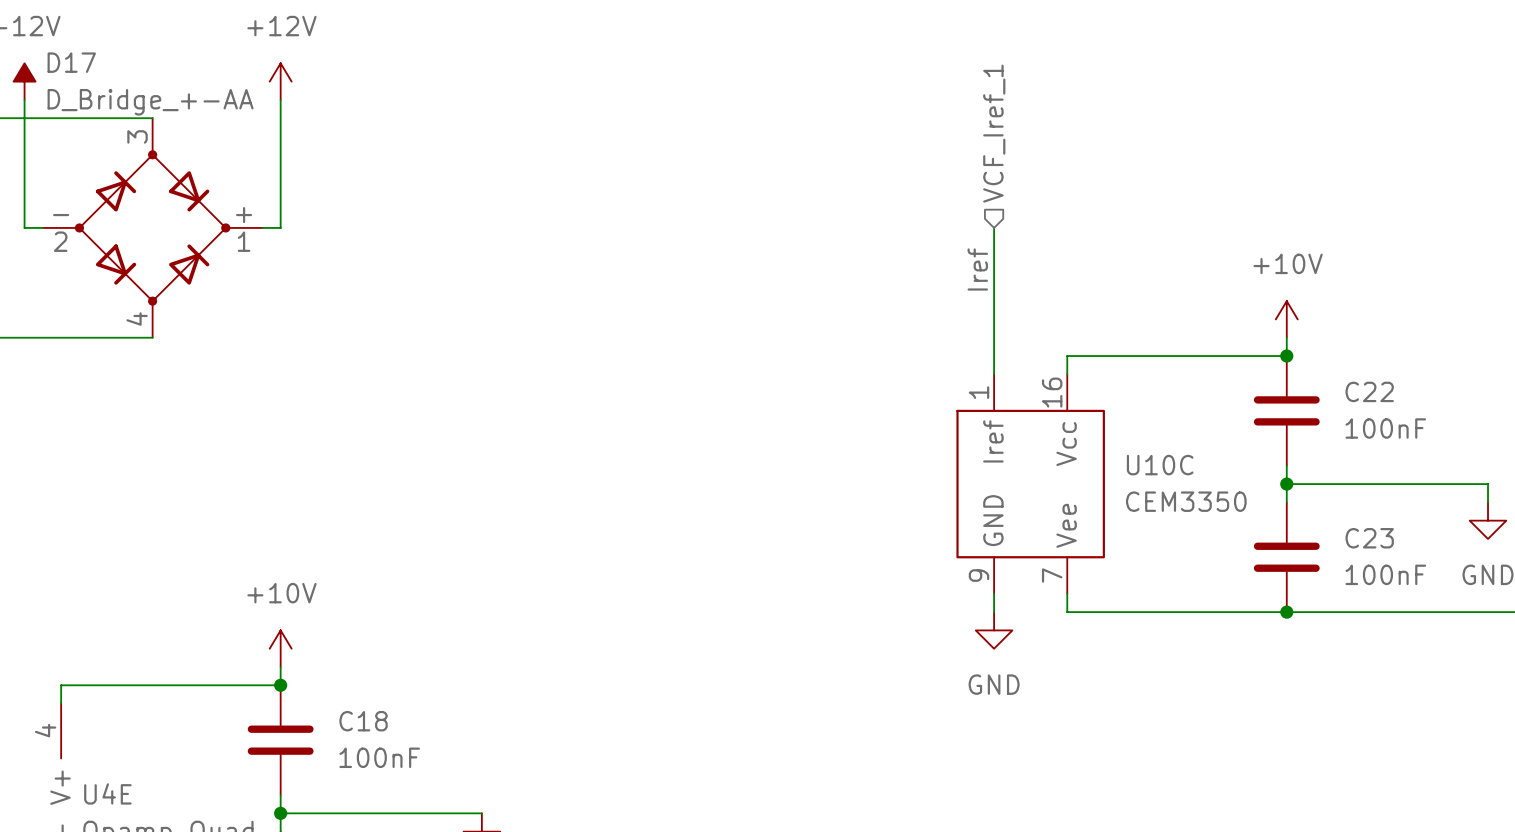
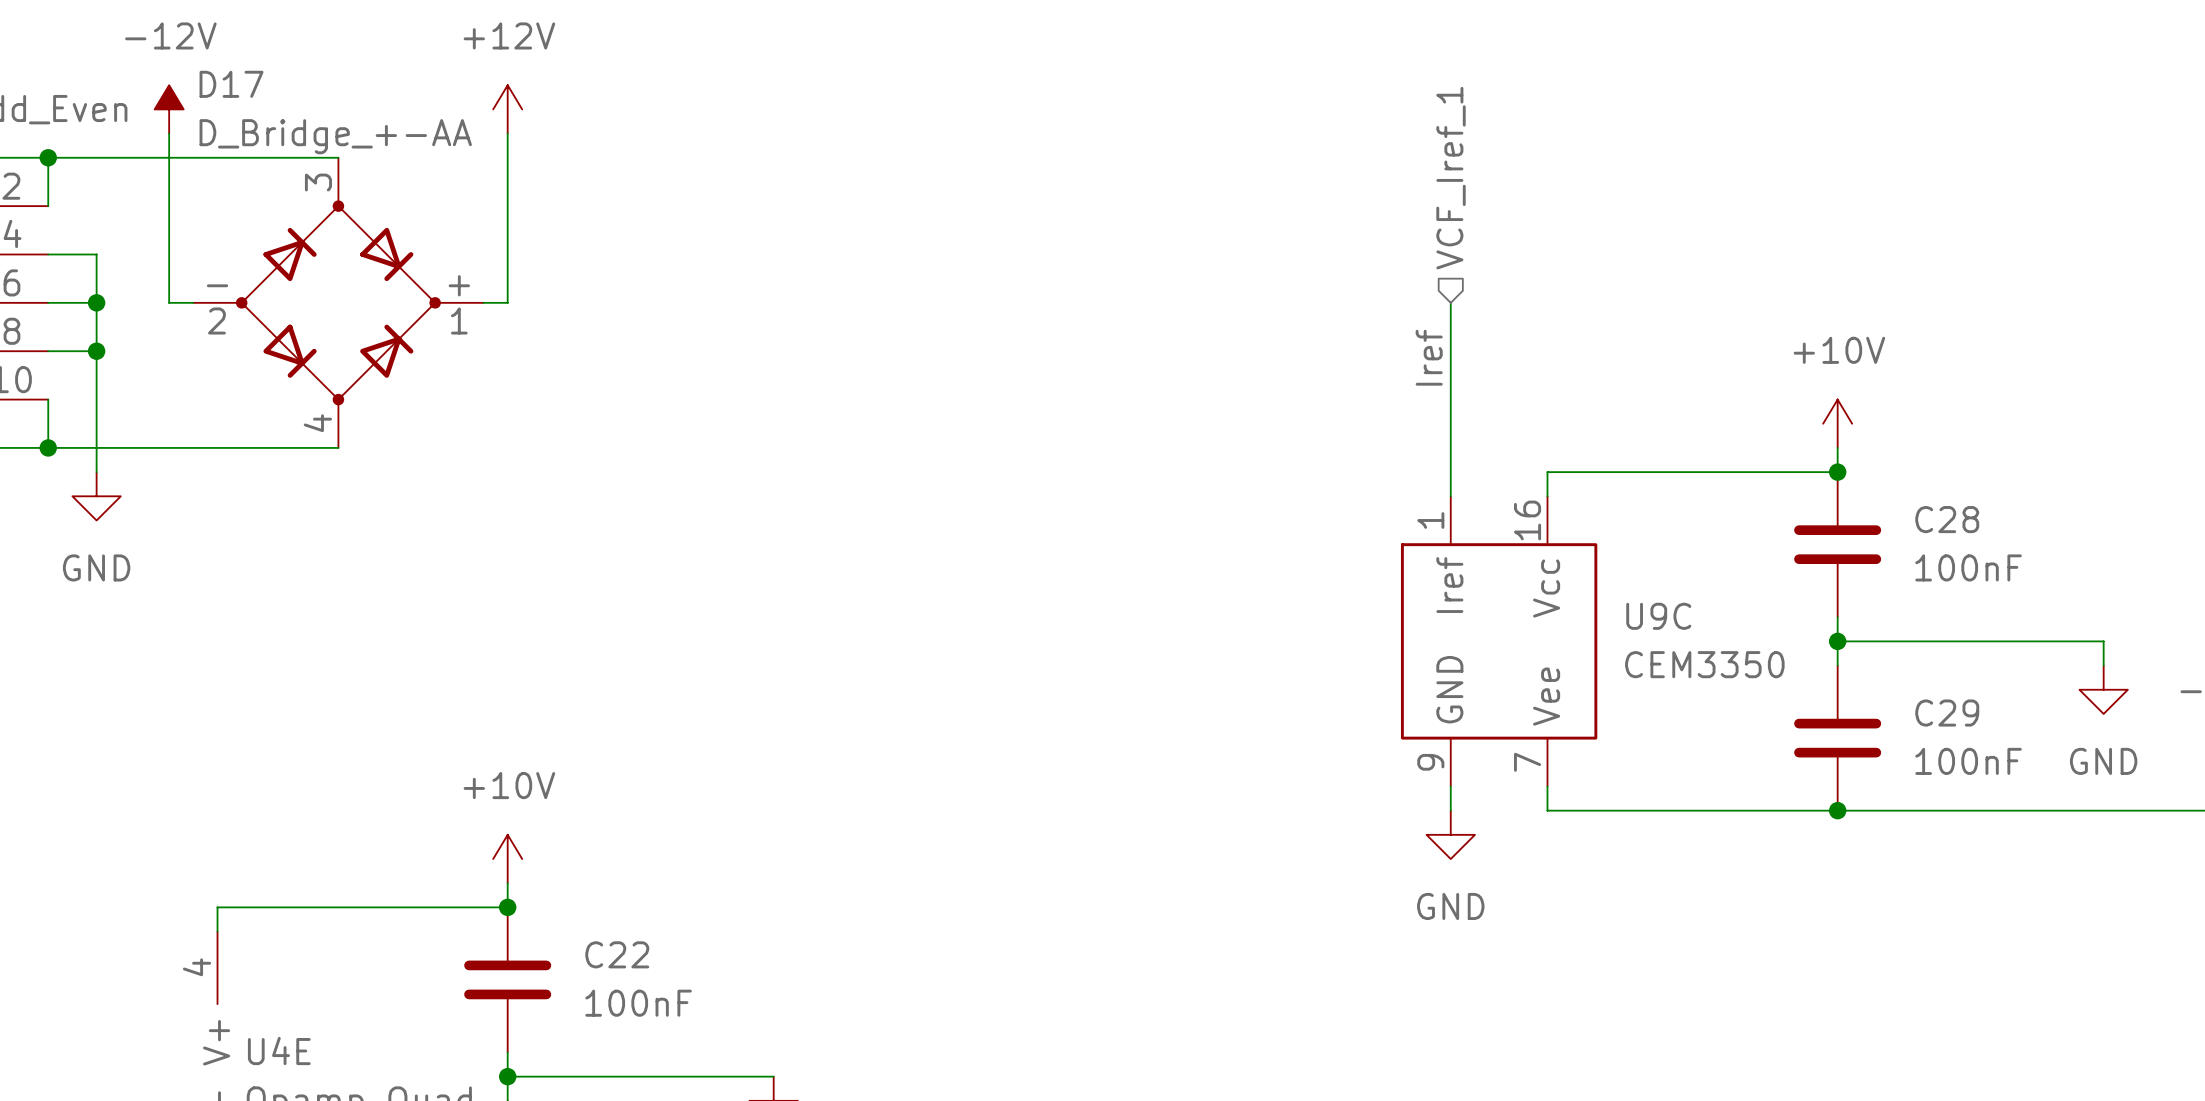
C22 name: C22 (1369, 391) -> C28 (1947, 519)
U10C name: U10C (1160, 465) -> U9C (1658, 616)
C23 name: C23 (1369, 538) -> C29 (1947, 713)
C18 name: C18 (363, 721) -> C22 (617, 954)

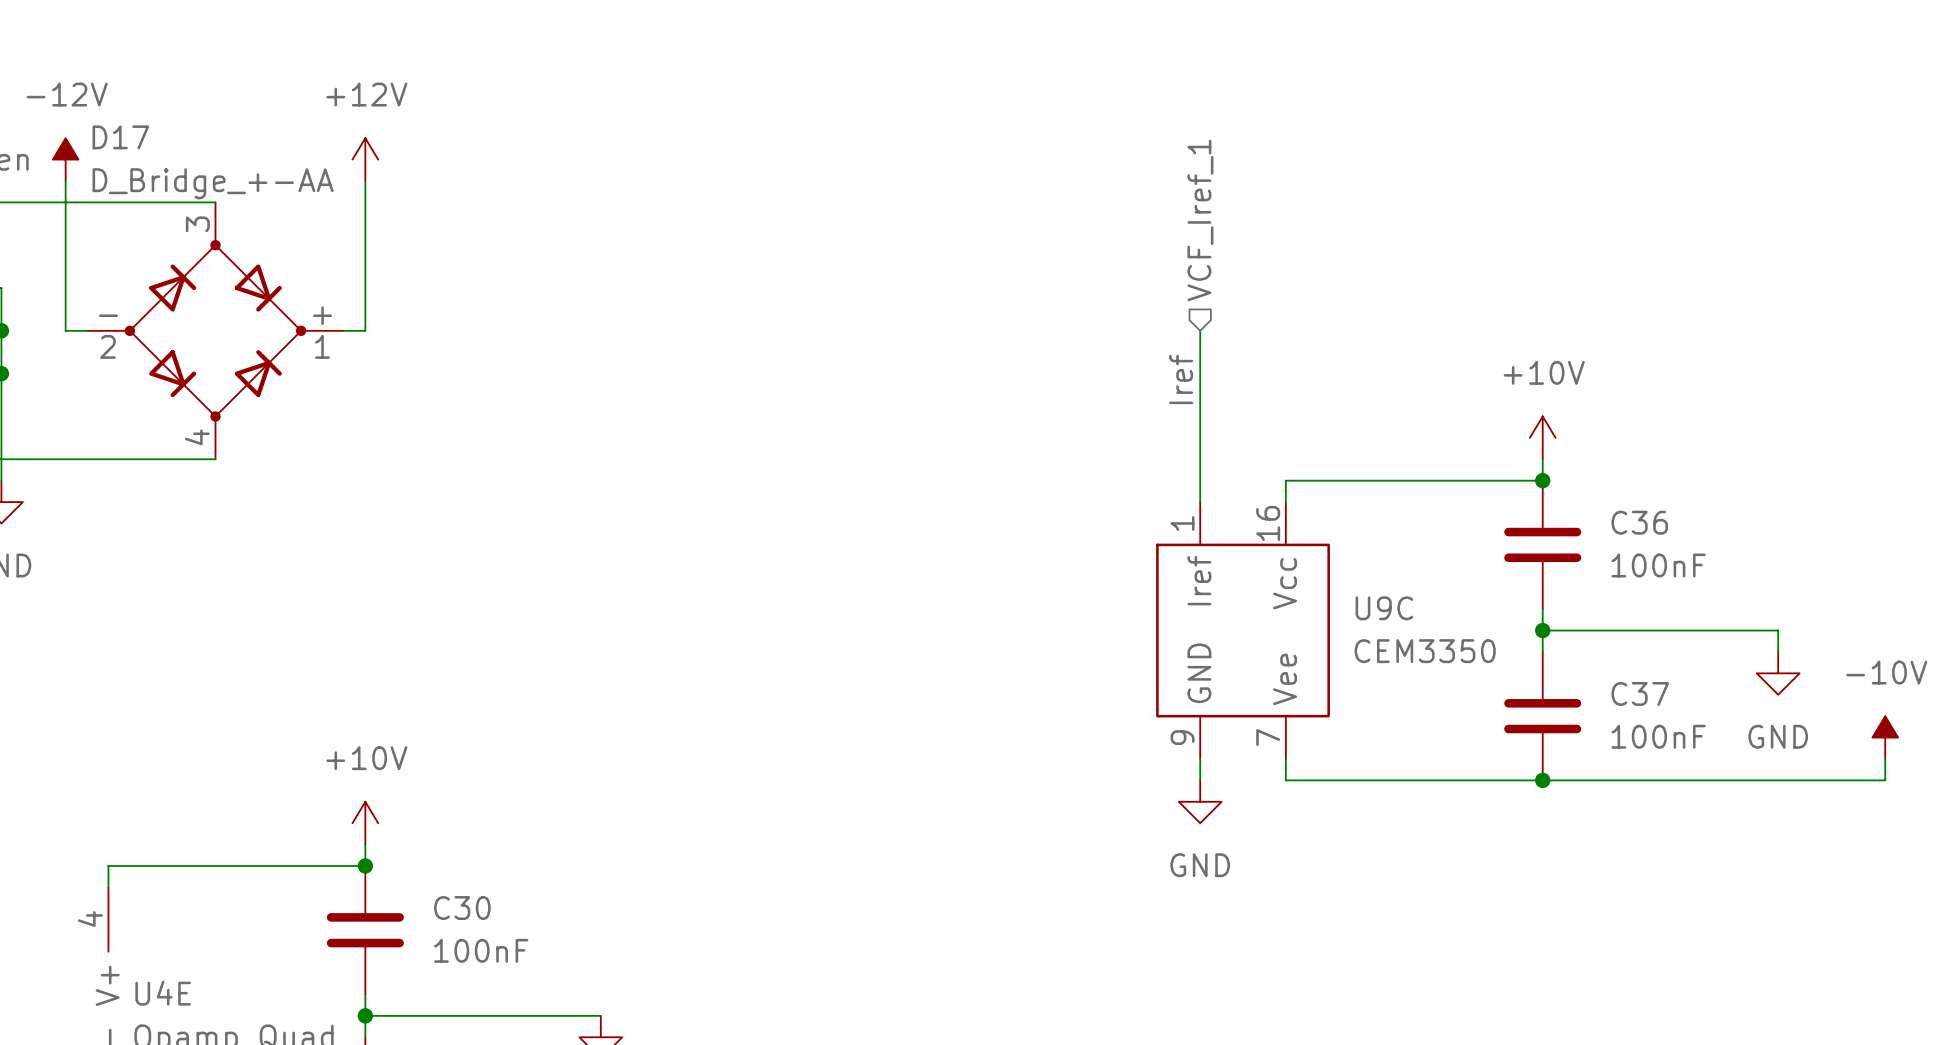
C28 name: C28 (1947, 519) -> C36 (1639, 522)
C29 name: C29 (1947, 713) -> C37 (1640, 693)
C22 name: C22 (617, 954) -> C30 (462, 908)

